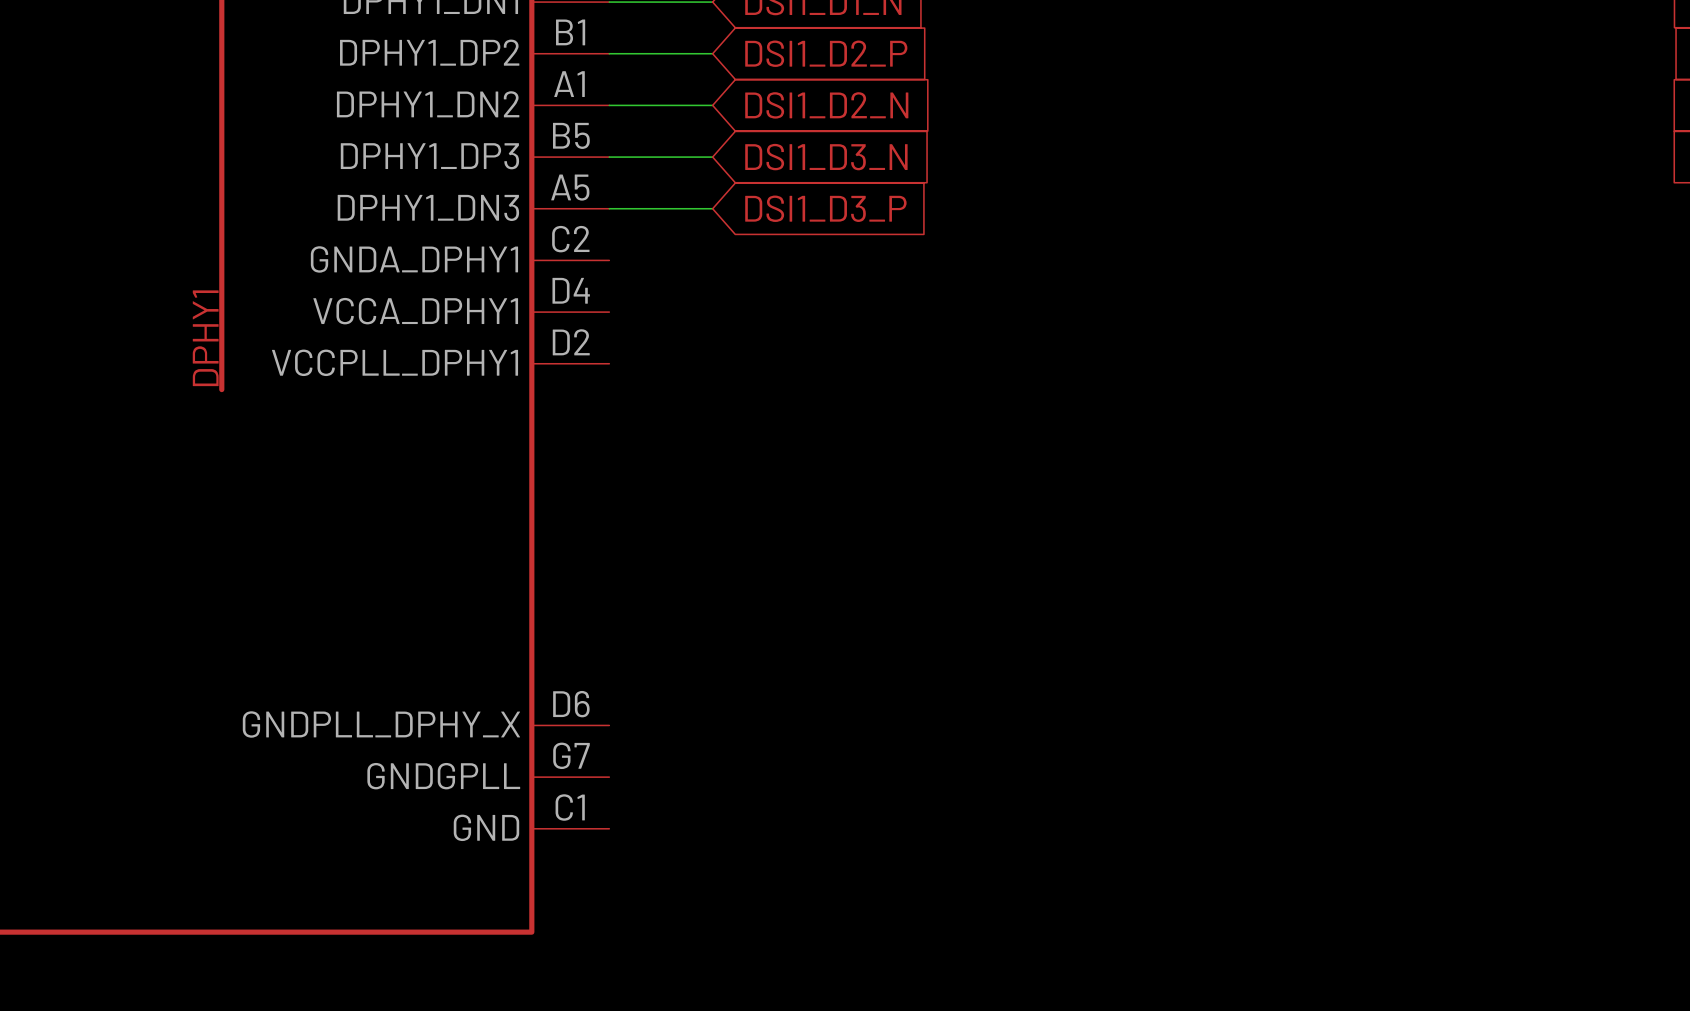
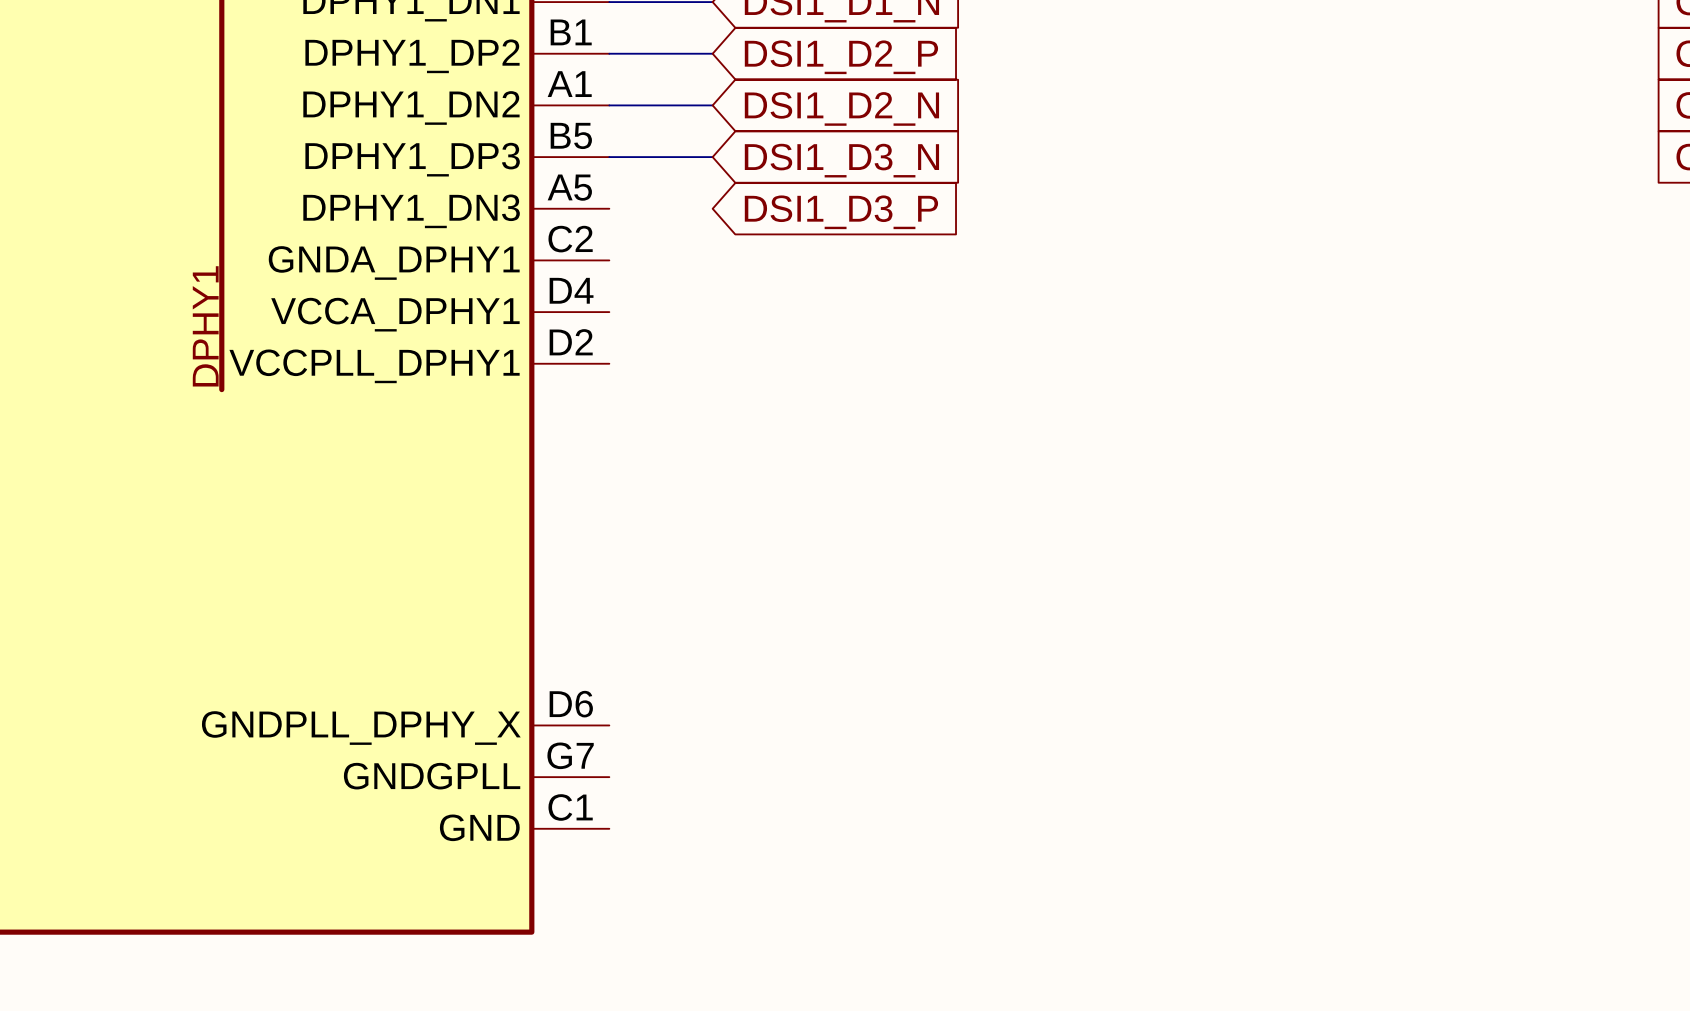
wire: (609, 208) (712, 208) -> none

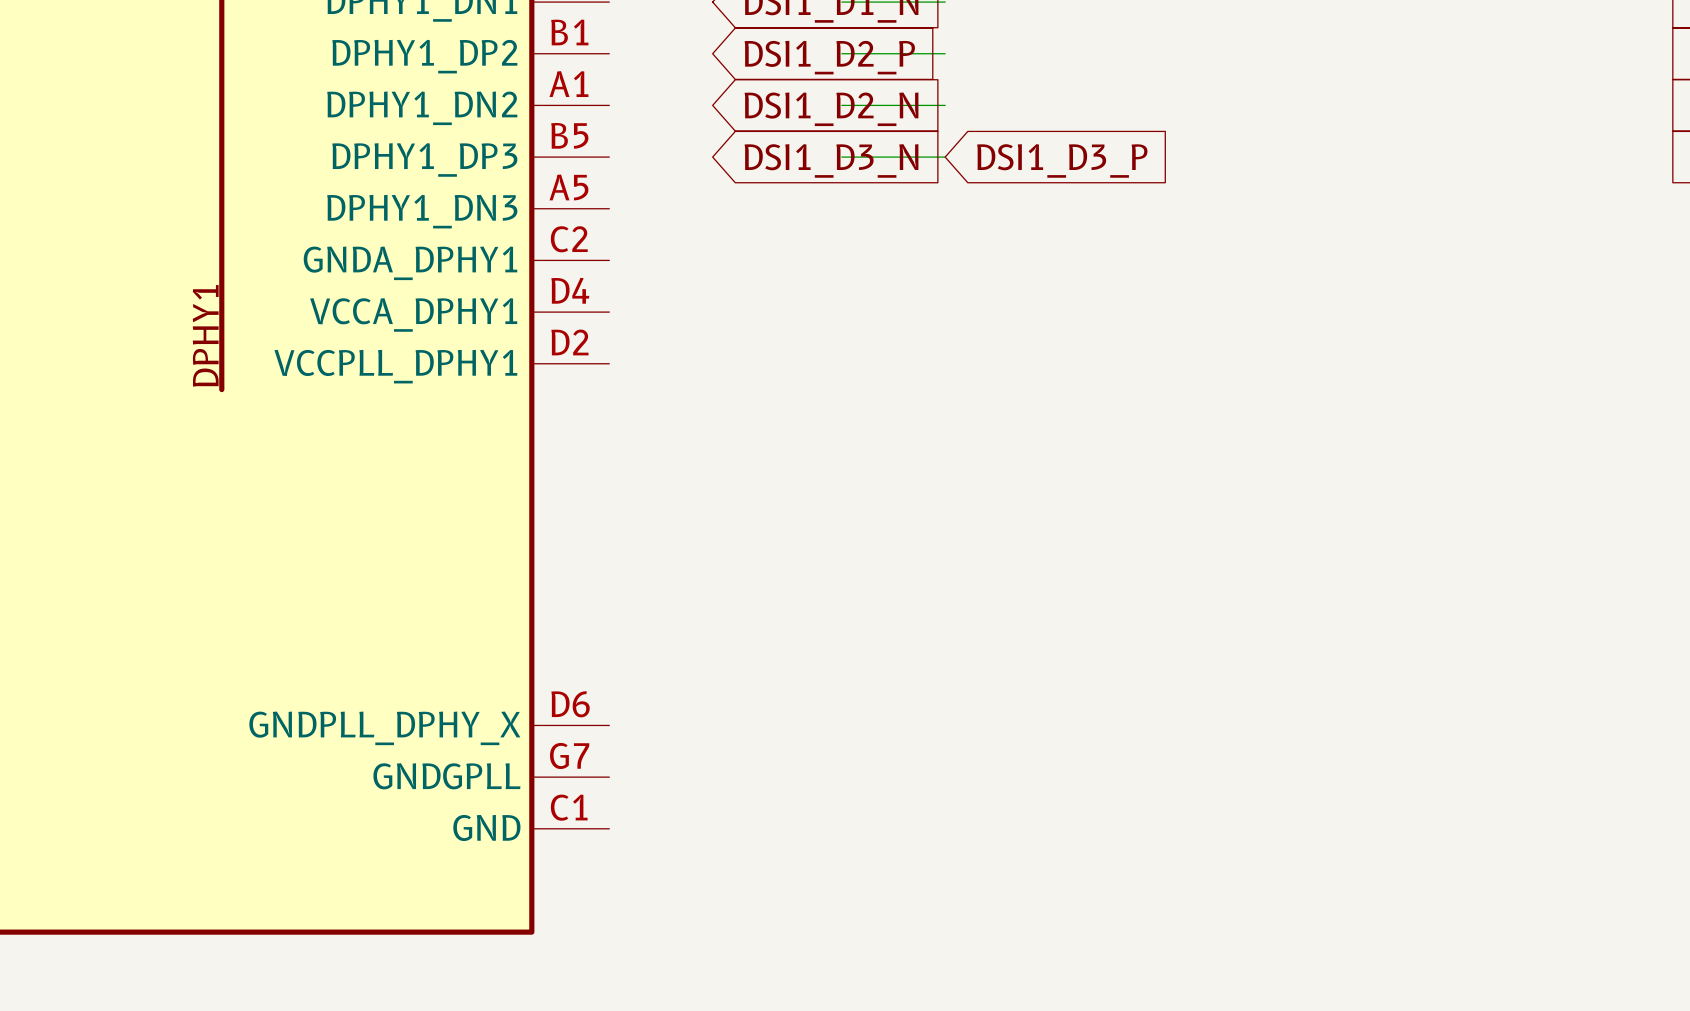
wire: (609, 2) (712, 2) -> (841, 2) (945, 2)
wire: (609, 53) (712, 53) -> (841, 53) (945, 53)
wire: (609, 105) (712, 105) -> (841, 105) (945, 105)
wire: (609, 157) (712, 157) -> (841, 157) (945, 157)
global label position: DSI1_D3_P (841, 212) -> DSI1_D3_P (1062, 160)

